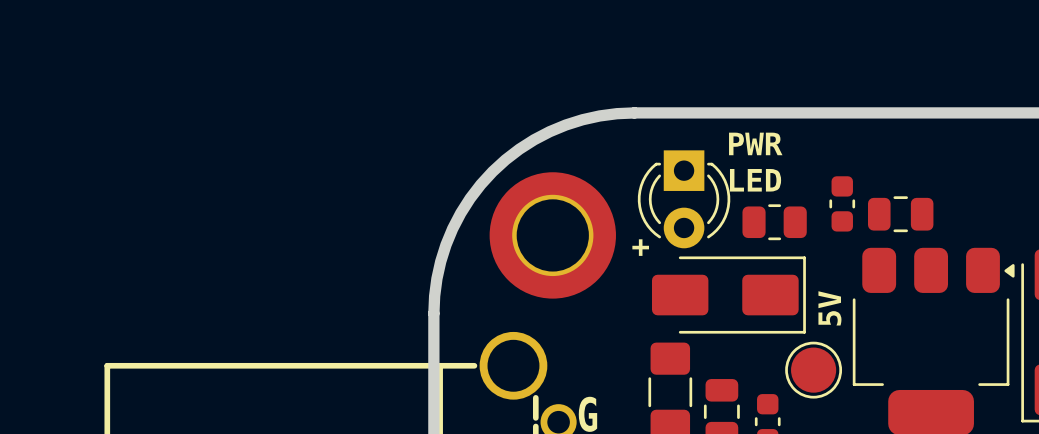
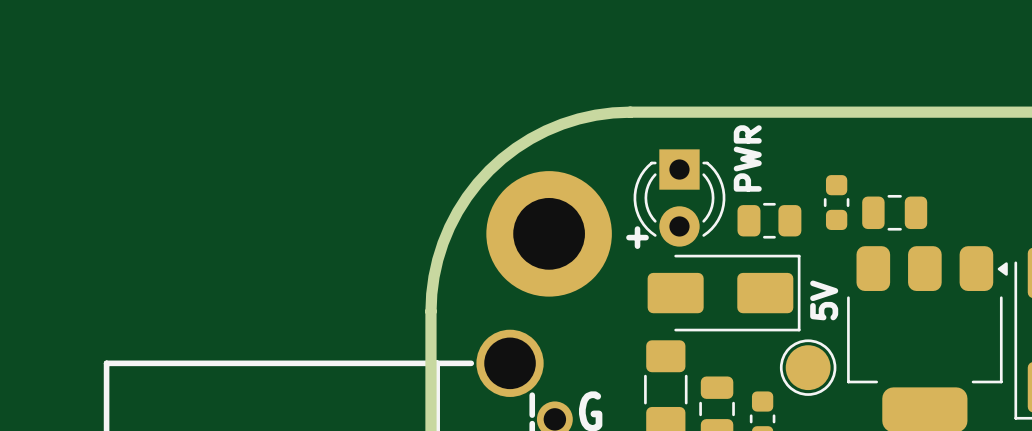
text rotation: 0° (755, 143) -> 90° counterclockwise (747, 158)
text: LED (755, 180) -> none

